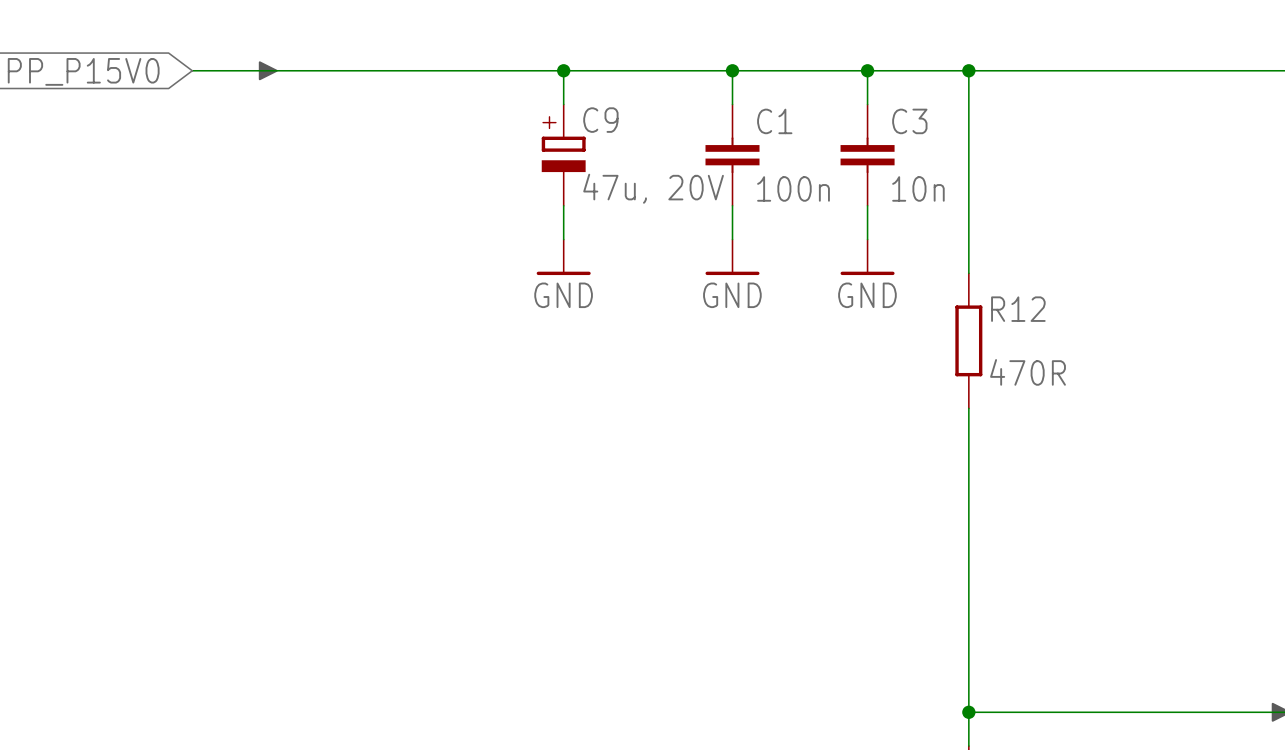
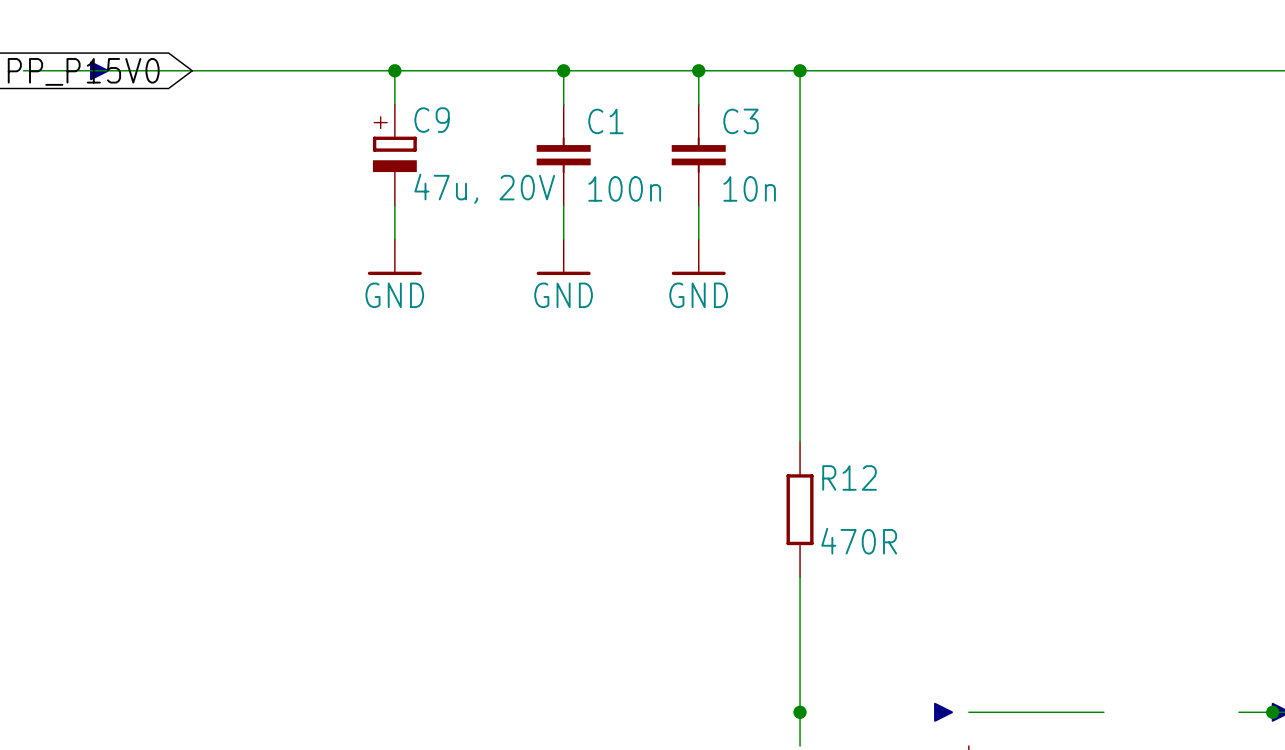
wire: none -> (23, 70) (192, 70)
part position: (268, 70) -> (99, 70)
wire: none -> (394, 70) (394, 104)
junction: none -> (394, 70)
junction: none -> (698, 70)
wire: (732, 70) (732, 104) -> none
junction: (732, 70) -> none
wire: none -> (800, 70) (800, 442)
junction: none -> (800, 70)
wire: (867, 70) (867, 104) -> (698, 70) (698, 104)
junction: (867, 70) -> none
wire: (968, 70) (968, 273) -> none
junction: (968, 70) -> none
C9 position: (563, 155) -> (394, 155)
C1 position: (732, 155) -> (563, 155)
C3 position: (867, 155) -> (698, 155)
wire: none -> (394, 205) (394, 239)
wire: (732, 205) (732, 239) -> none
wire: (867, 205) (867, 239) -> (698, 205) (698, 239)
power symbol: none -> GND (394, 257)
power symbol position: GND (732, 257) -> GND (698, 257)
power symbol: GND (867, 257) -> none
R12 position: (968, 340) -> (800, 509)
wire: (968, 408) (968, 746) -> none
wire: none -> (800, 577) (800, 746)
junction: none -> (800, 712)
part: none -> (943, 712)
junction: (968, 712) -> none
wire: (1103, 712) (1238, 712) -> none
junction: none -> (1272, 712)

